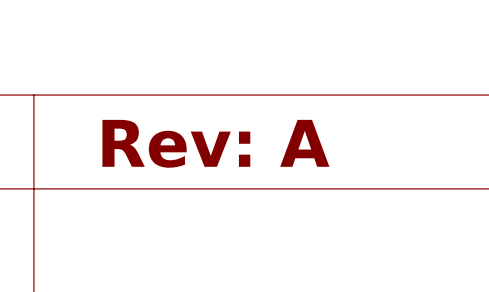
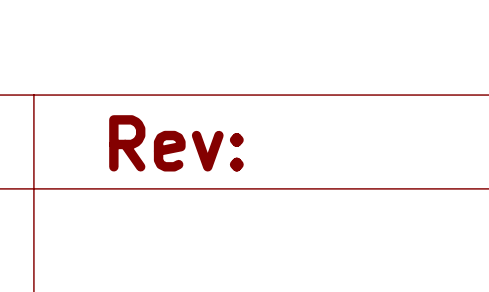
title block: Rev: A (215, 143) -> Rev: (176, 143)

